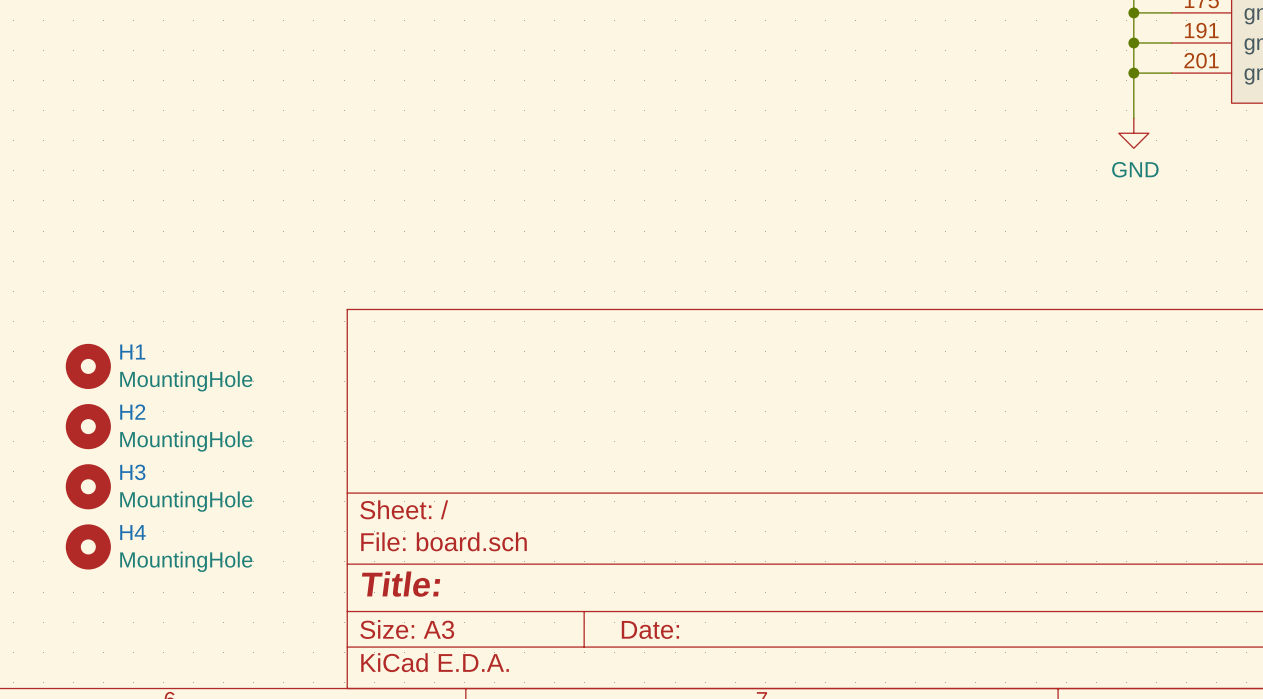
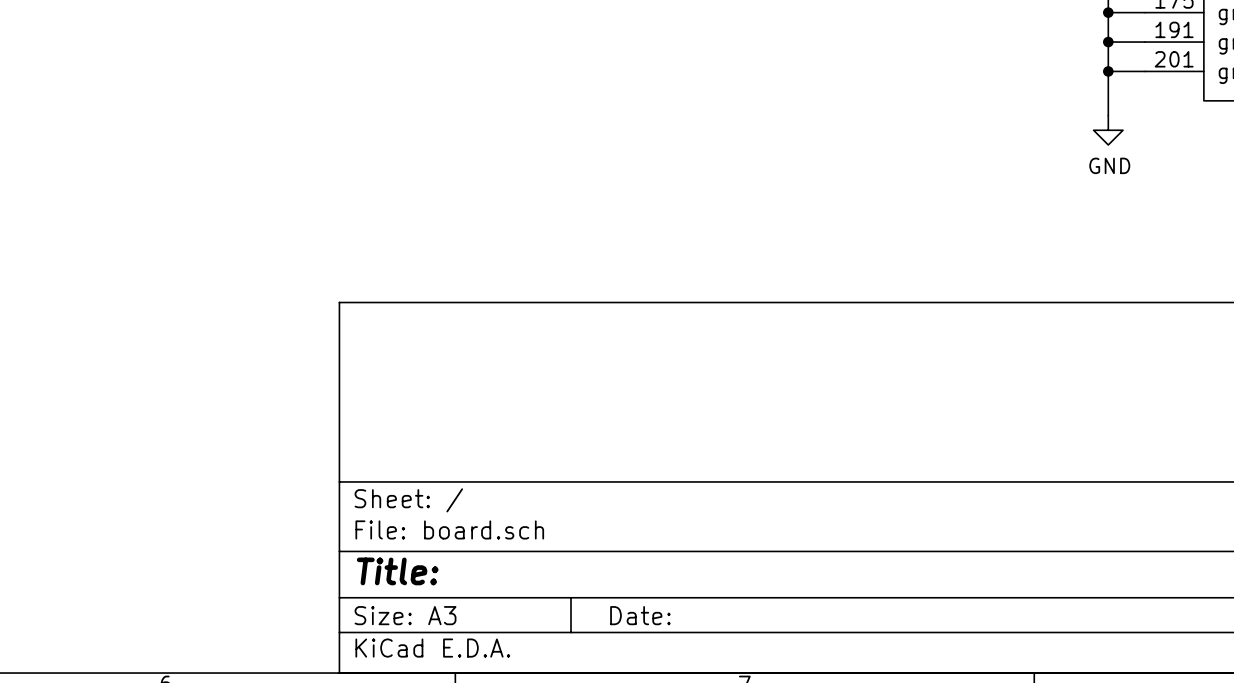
H1: MountingHole (88, 366) -> none
H2: MountingHole (88, 426) -> none
H3: MountingHole (88, 486) -> none
H4: MountingHole (88, 546) -> none

